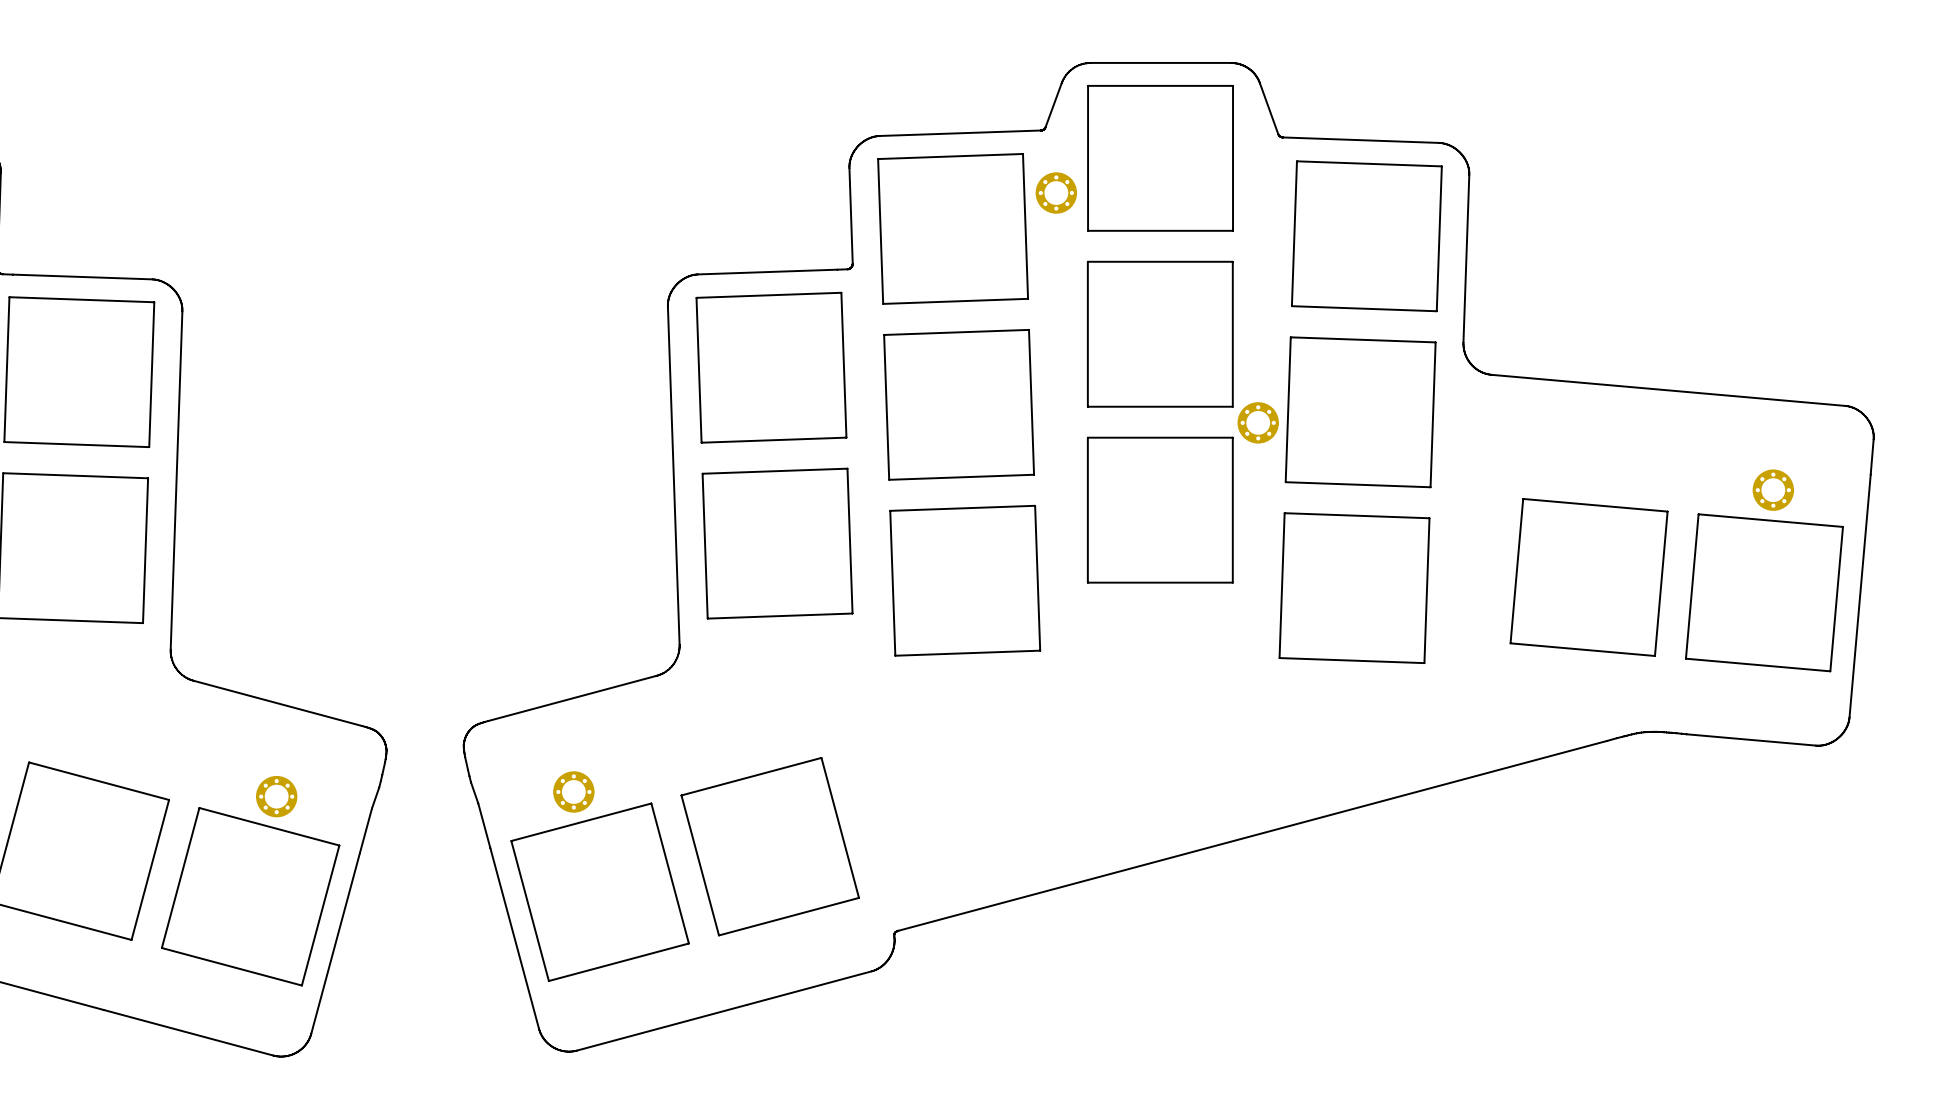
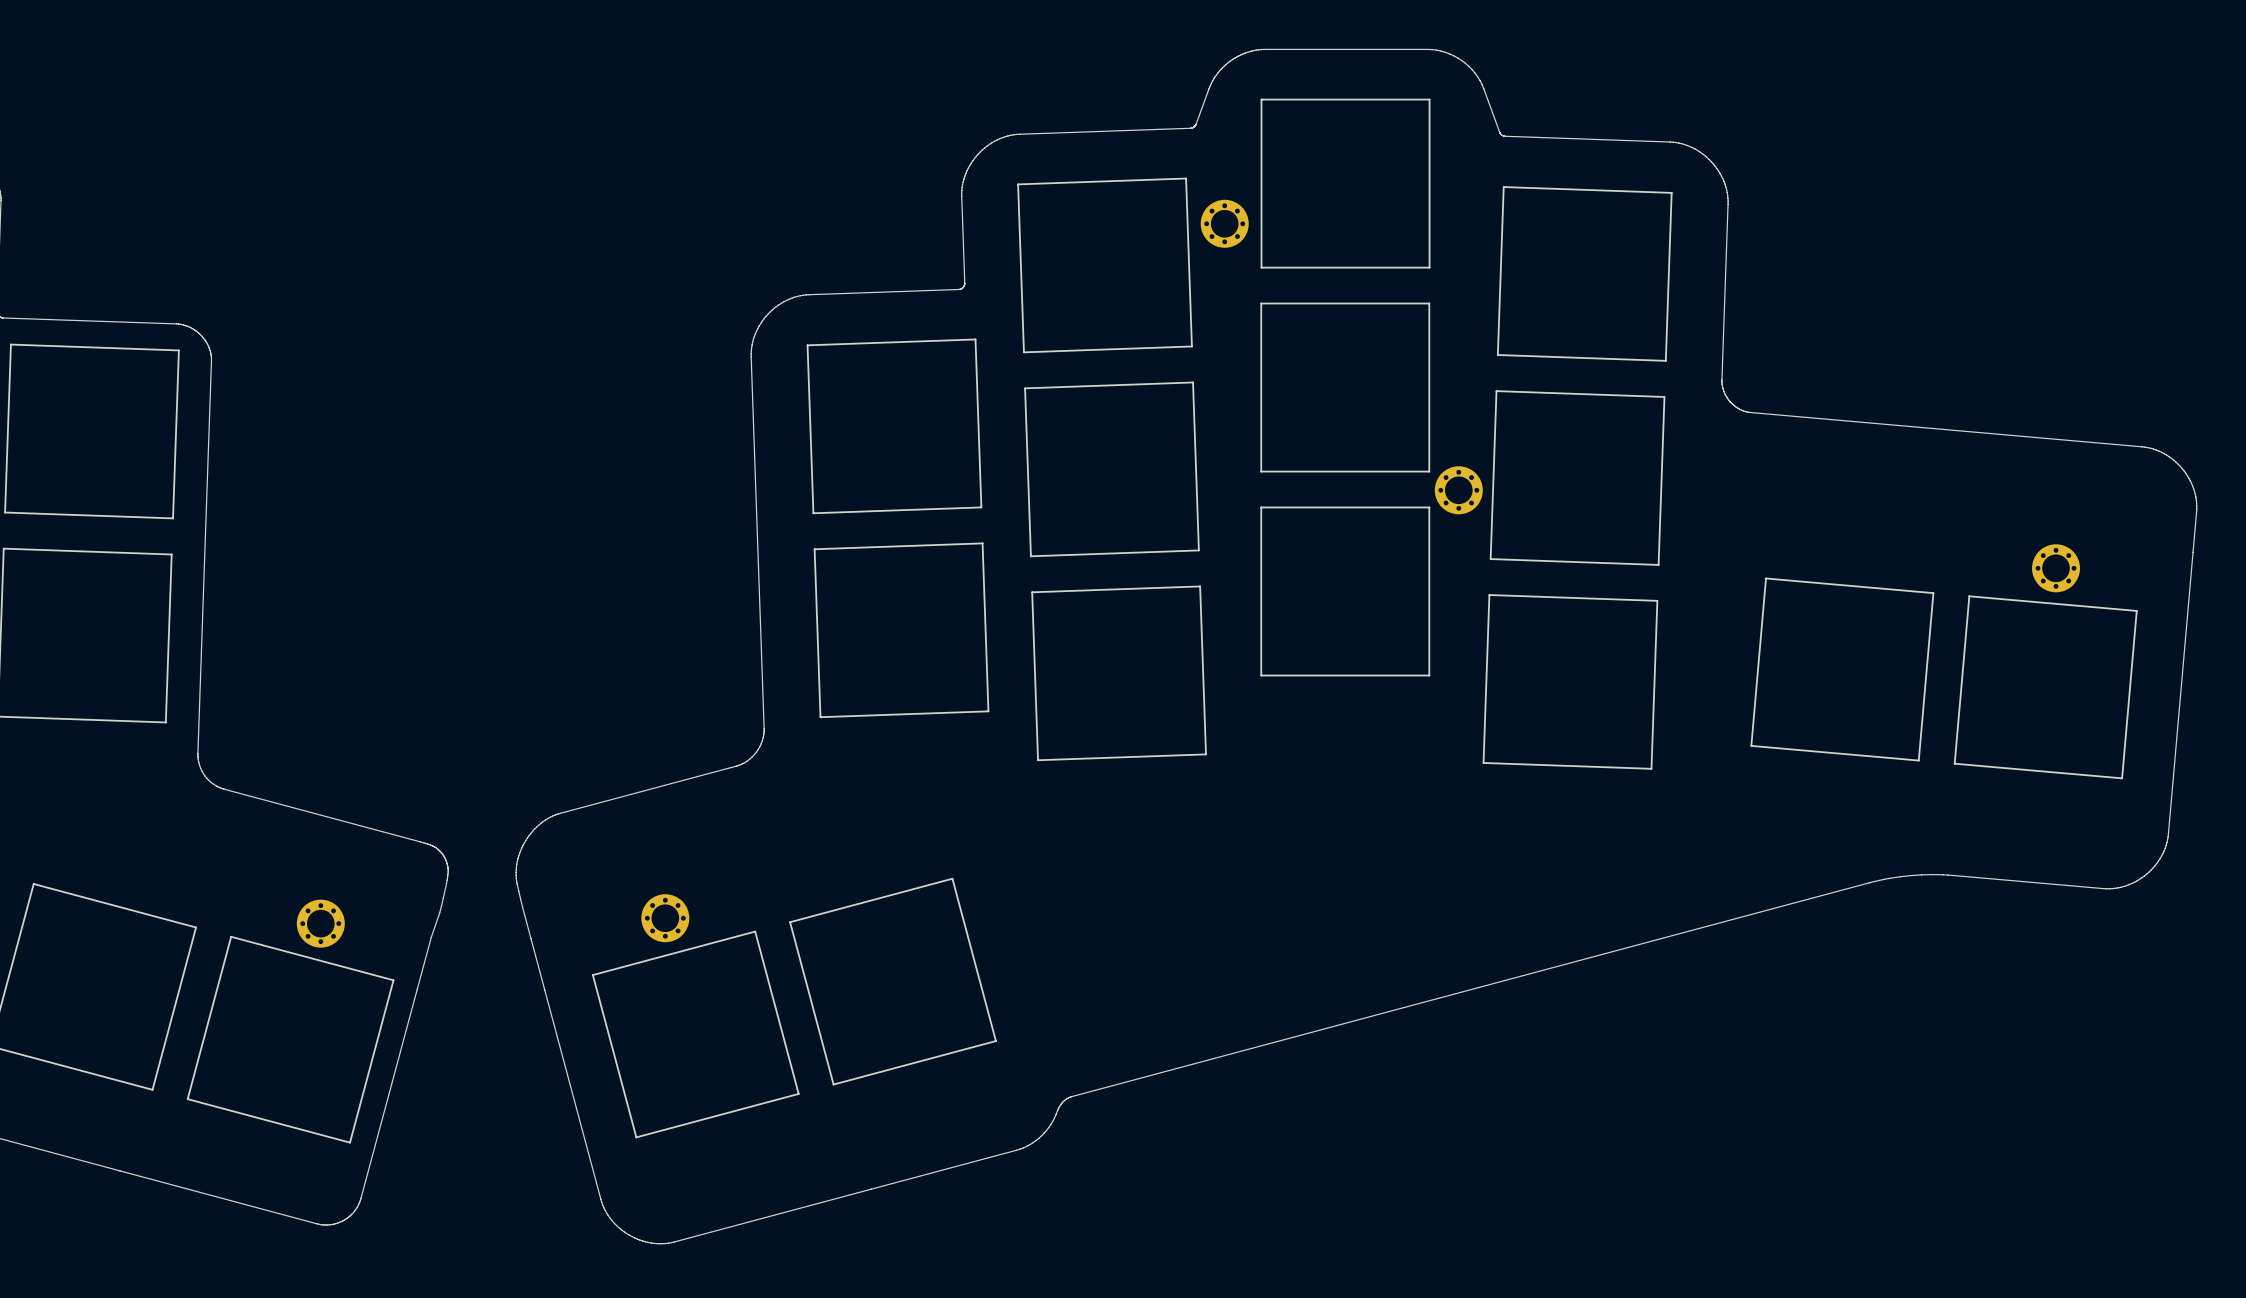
board edge: none -> (1265, 49) (1241, 54) (1220, 69) (1210, 84) (1196, 124)
board edge: none -> (1265, 49) (1427, 49)
board edge: none -> (1427, 49) (1449, 53) (1472, 69) (1482, 84) (1499, 132) (1502, 135) (1676, 142) (1695, 149) (1713, 163) (1723, 181) (1728, 201) (1722, 384) (1727, 398) (1739, 409) (1750, 412) (2144, 447) (2164, 453) (2180, 466) (2192, 486) (2196, 508) (2168, 834) (2165, 848) (2158, 861) (2148, 872) (2137, 880) (2112, 888) (1937, 874) (1900, 876) (1874, 881) (1071, 1096) (1061, 1104) (1050, 1124) (1041, 1135) (1029, 1144) (1016, 1150) (671, 1242) (654, 1243) (634, 1237) (613, 1222) (601, 1202) (522, 906) (516, 880) (516, 867) (519, 853) (527, 837) (538, 825) (550, 817) (739, 765) (752, 756) (761, 743) (764, 728) (751, 356) (752, 342) (757, 328) (765, 316) (776, 306) (800, 295) (962, 288) (964, 283) (961, 196) (963, 181) (974, 158) (984, 147) (997, 139) (1019, 134) (1190, 128)
board edge: (1045, 127) (1063, 78) (1071, 69) (1081, 64) (1232, 62) (1245, 66) (1256, 76) (1278, 134) (1282, 137) -> none
board edge: (1045, 127) (1044, 128) -> none
board edge: (1040, 130) (879, 135) (869, 138) (856, 148) (849, 163) (852, 263) (850, 268) (696, 274) (686, 277) (676, 284) (670, 294) (667, 305) (679, 644) (676, 660) (668, 669) (657, 675) (478, 723) (469, 731) (464, 742) (464, 754) (471, 782) (539, 1030) (545, 1040) (556, 1048) (566, 1051) (576, 1050) (873, 970) (882, 965) (889, 957) (896, 931) -> none
board edge: (1283, 137) (1440, 143) (1452, 146) (1461, 154) (1467, 163) (1469, 173) (1463, 345) (1468, 361) (1481, 372) (1491, 374) (1845, 405) (1855, 408) (1865, 416) (1871, 426) (1873, 438) (1849, 717) (1846, 727) (1834, 740) (1818, 745) (1661, 732) (1634, 733) (898, 930) -> none

